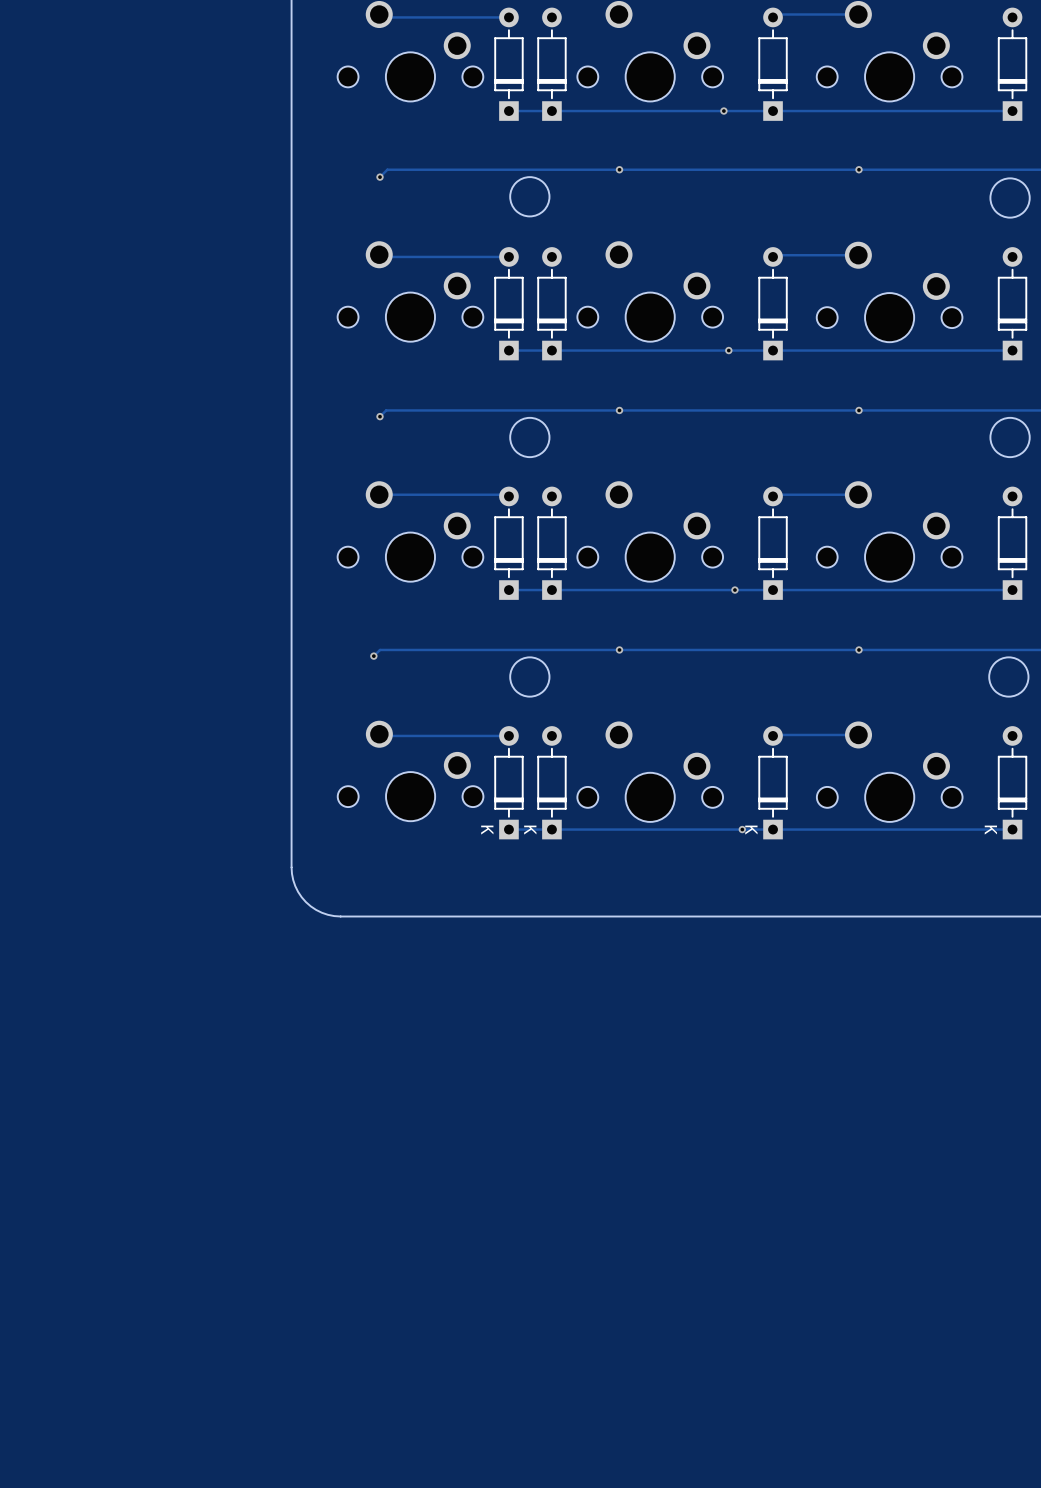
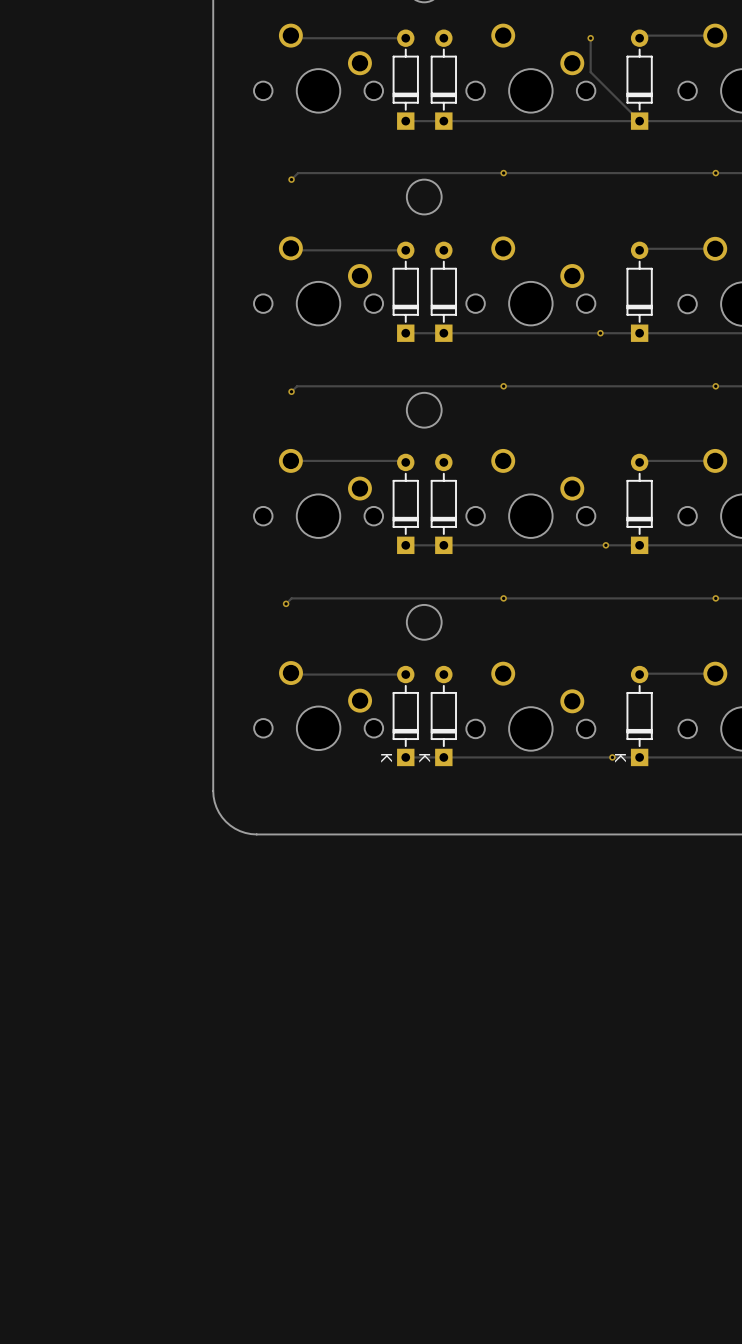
track: none -> (590, 38) (590, 72) (639, 121)
via: none -> (590, 38)
via: (723, 111) -> none

